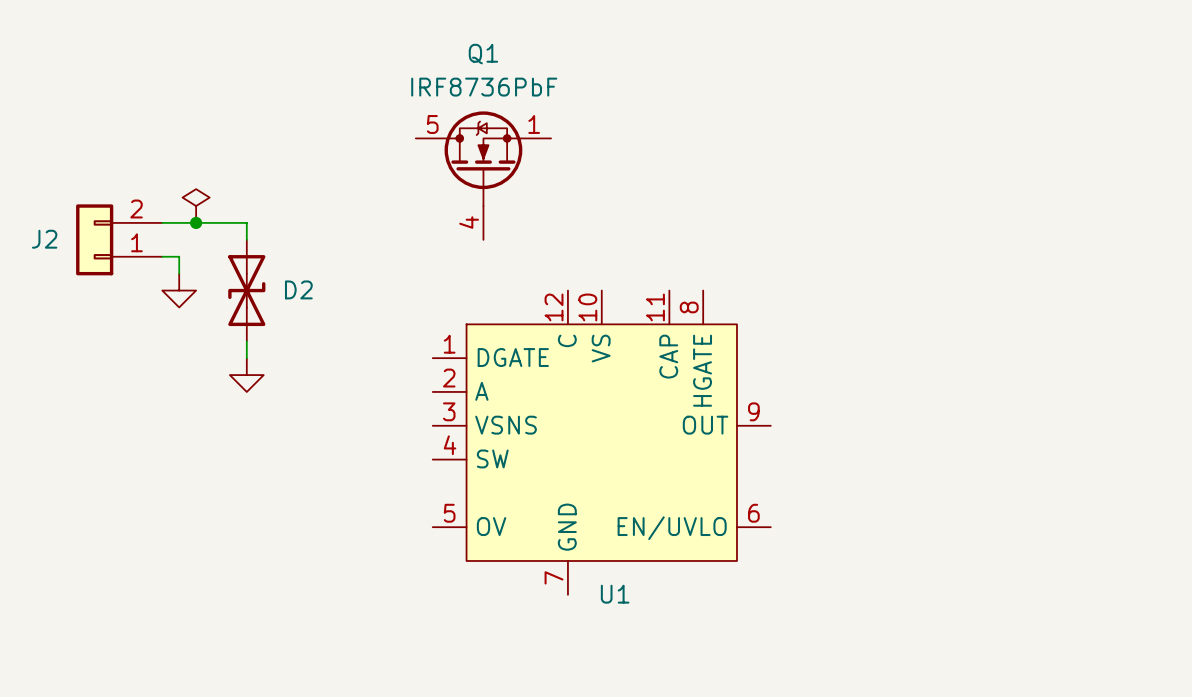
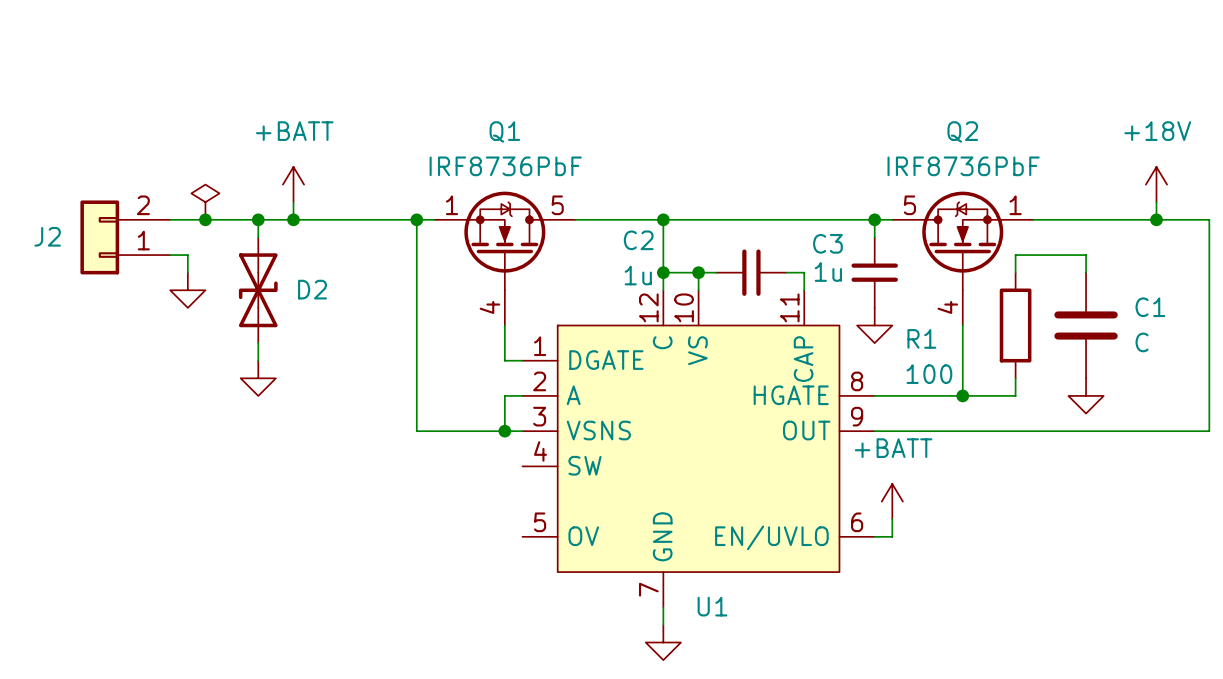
Q1 flip: as is (483, 158) -> left-right (504, 240)
Q1 position: (483, 175) -> (504, 258)
power symbol: none -> +BATT (293, 184)
power symbol: none -> +18V (1156, 184)
wire: none -> (293, 202) (293, 219)
wire: none -> (1156, 202) (1156, 219)
wire: none -> (258, 219) (434, 219)
junction: none -> (258, 219)
junction: none -> (293, 219)
wire: none -> (416, 219) (416, 431) (522, 431)
junction: none -> (416, 219)
wire: none -> (575, 219) (892, 219)
wire: none -> (663, 219) (663, 290)
junction: none -> (663, 219)
wire: none -> (874, 219) (874, 237)
junction: none -> (874, 219)
wire: none -> (1033, 219) (1209, 219) (1209, 431) (874, 431)
junction: none -> (1156, 219)
Q2: none -> IRF8736PbF (962, 258)
wire: none -> (663, 272) (716, 272)
junction: none -> (663, 272)
wire: none -> (698, 272) (698, 290)
junction: none -> (698, 272)
C2: none -> 1u (751, 272)
wire: none -> (786, 272) (804, 272) (804, 290)
C3: none -> 1u (874, 272)
wire: none -> (1015, 272) (1015, 255) (1086, 255) (1086, 272)
U1 symbol: [432, 290, 771, 595] -> [522, 290, 875, 608]
power symbol: none -> (874, 325)
wire: none -> (962, 325) (962, 395)
R1: none -> 100 (1015, 325)
C1: none -> C (1086, 325)
wire: none -> (1015, 378) (1015, 395) (874, 395)
junction: none -> (962, 395)
power symbol: none -> (1086, 395)
junction: none -> (504, 431)
power symbol: none -> +BATT (892, 501)
wire: none -> (892, 519) (892, 536) (874, 536)
wire: none -> (663, 607) (663, 624)
power symbol: none -> (663, 642)

